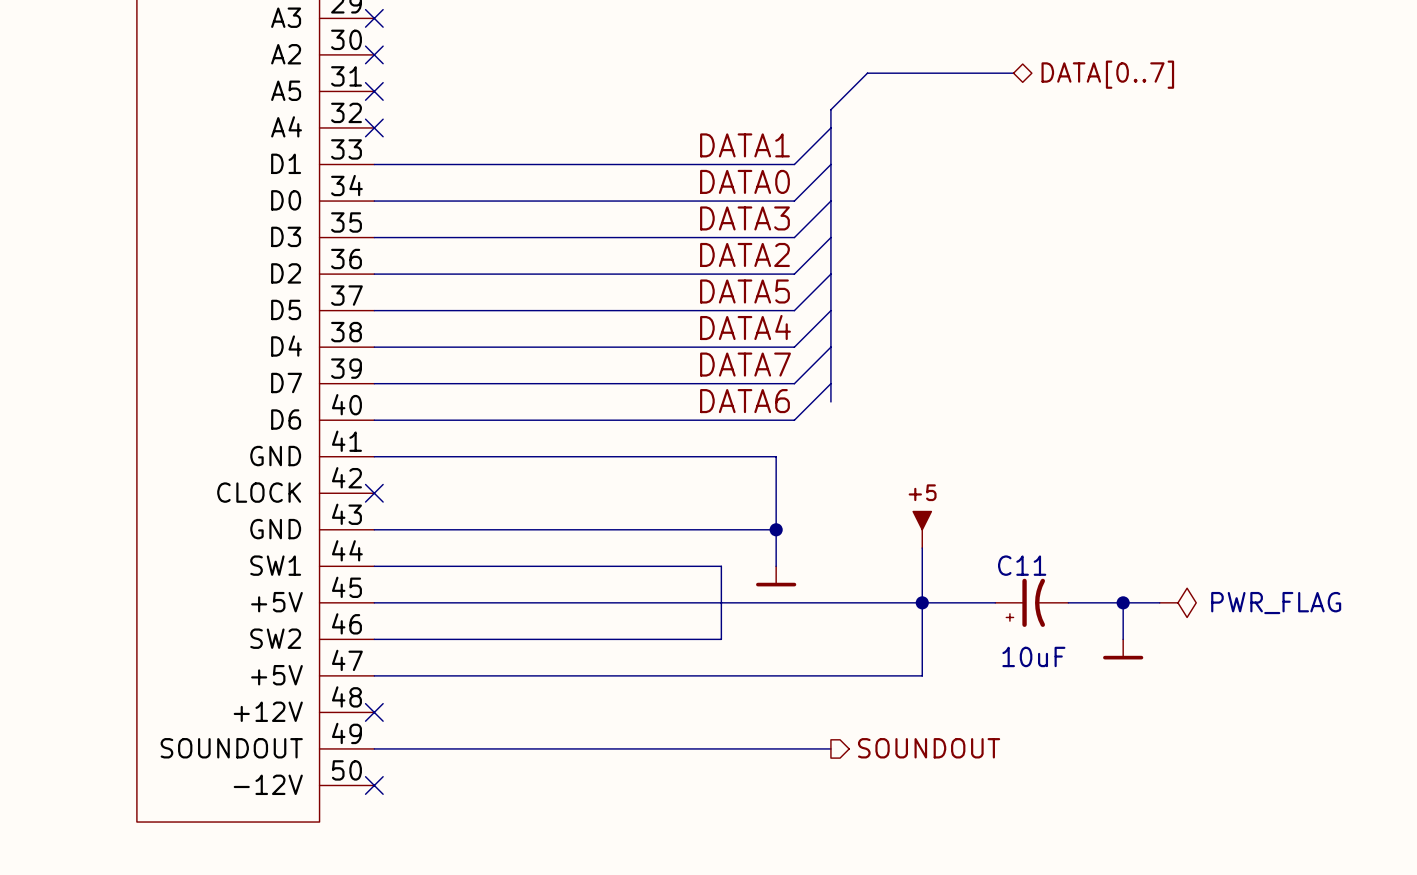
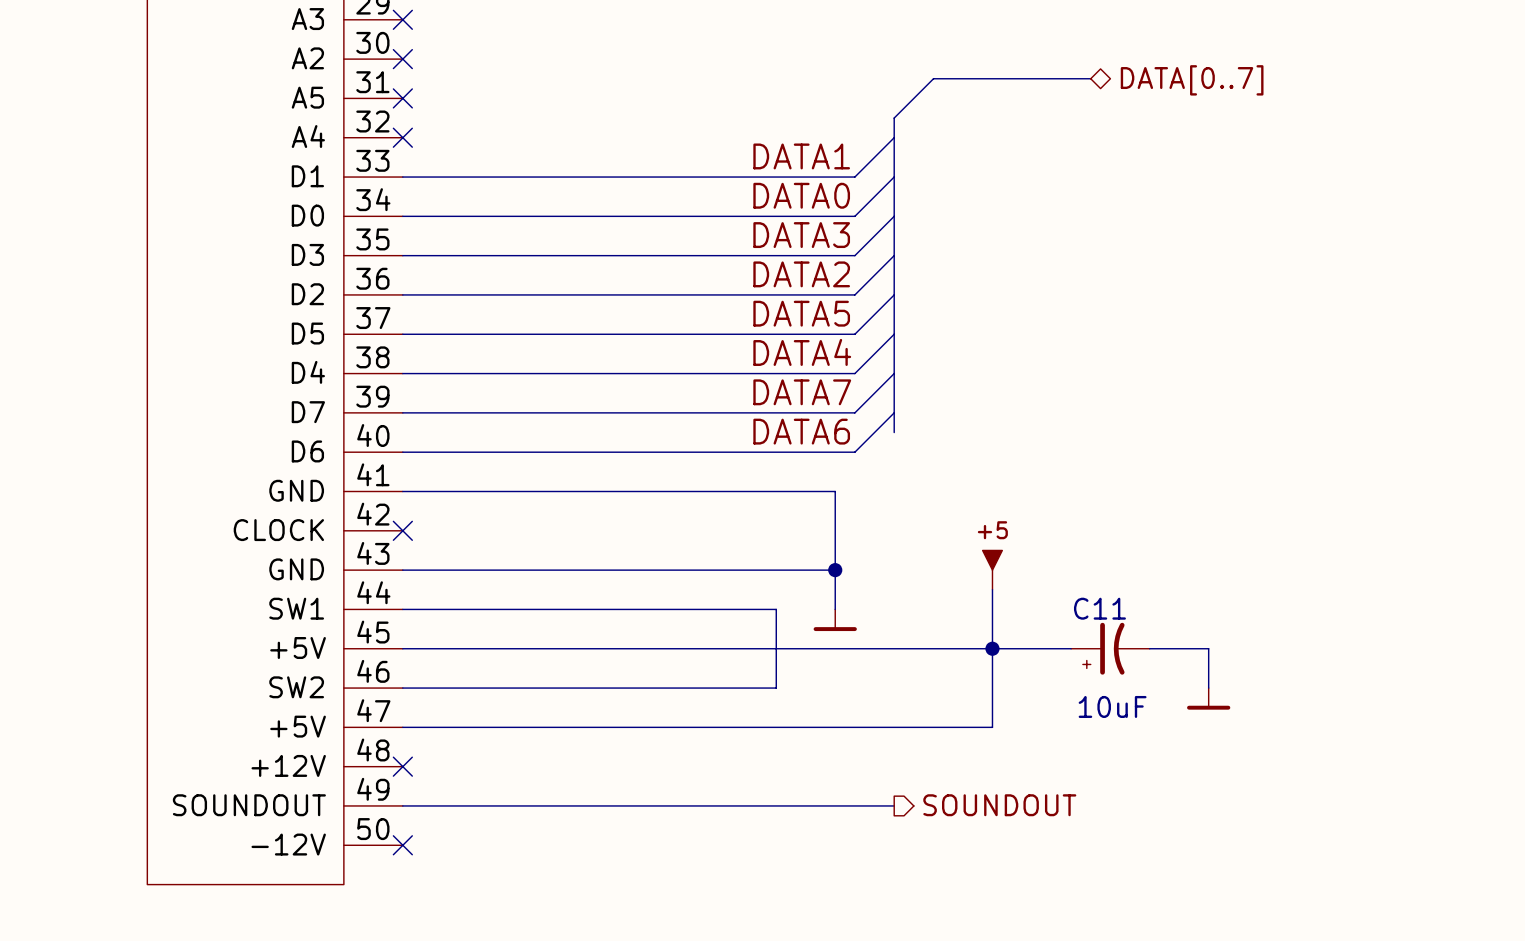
wire: (1123, 602) (1159, 602) -> none
junction: (1123, 602) -> none
power symbol: PWR_FLAG (1177, 602) -> none

